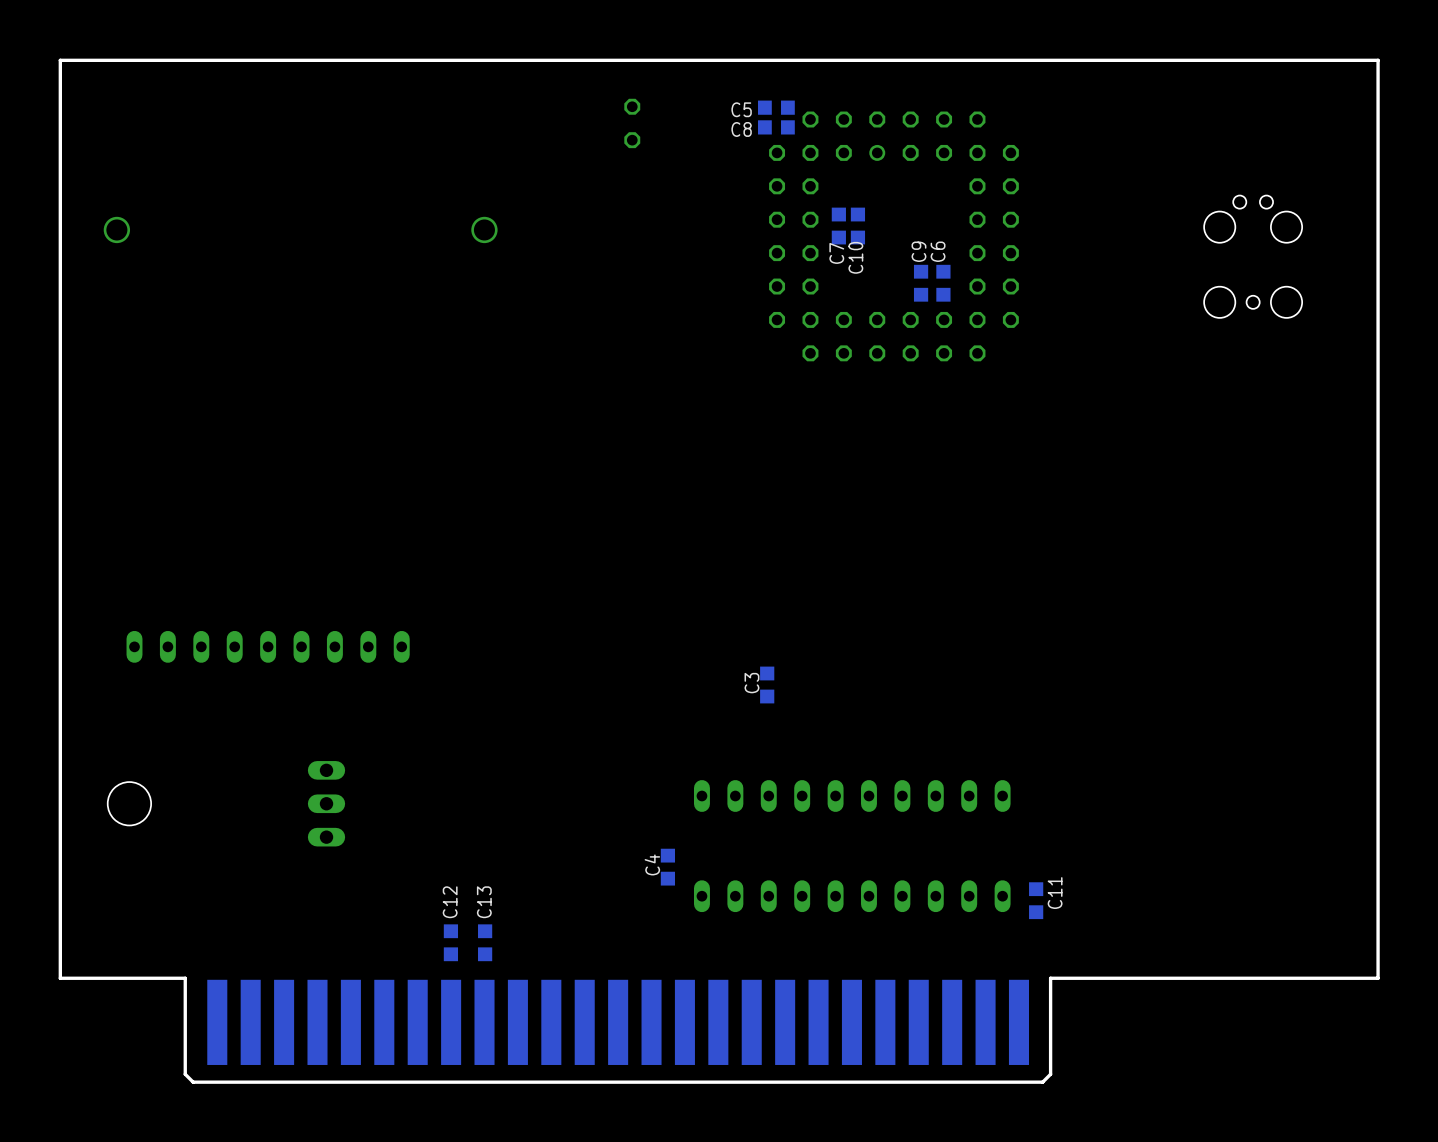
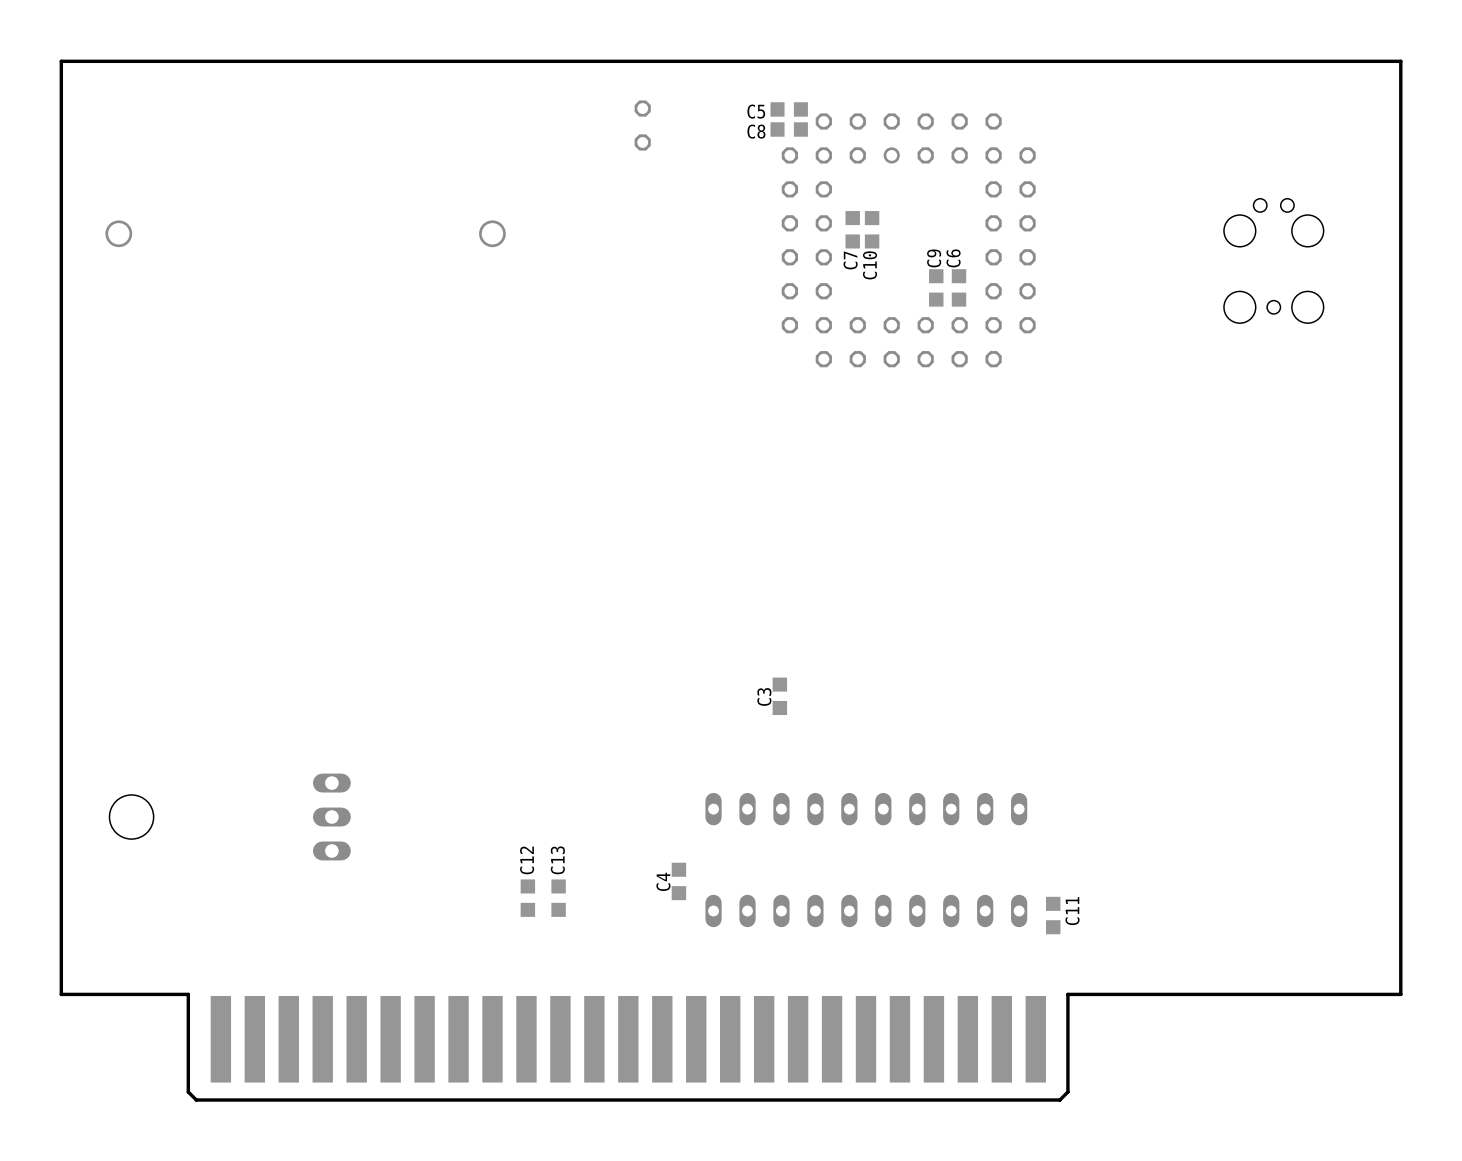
part: (268, 646) -> none
C12 position: (450, 942) -> (527, 898)
C13 position: (485, 942) -> (558, 898)

